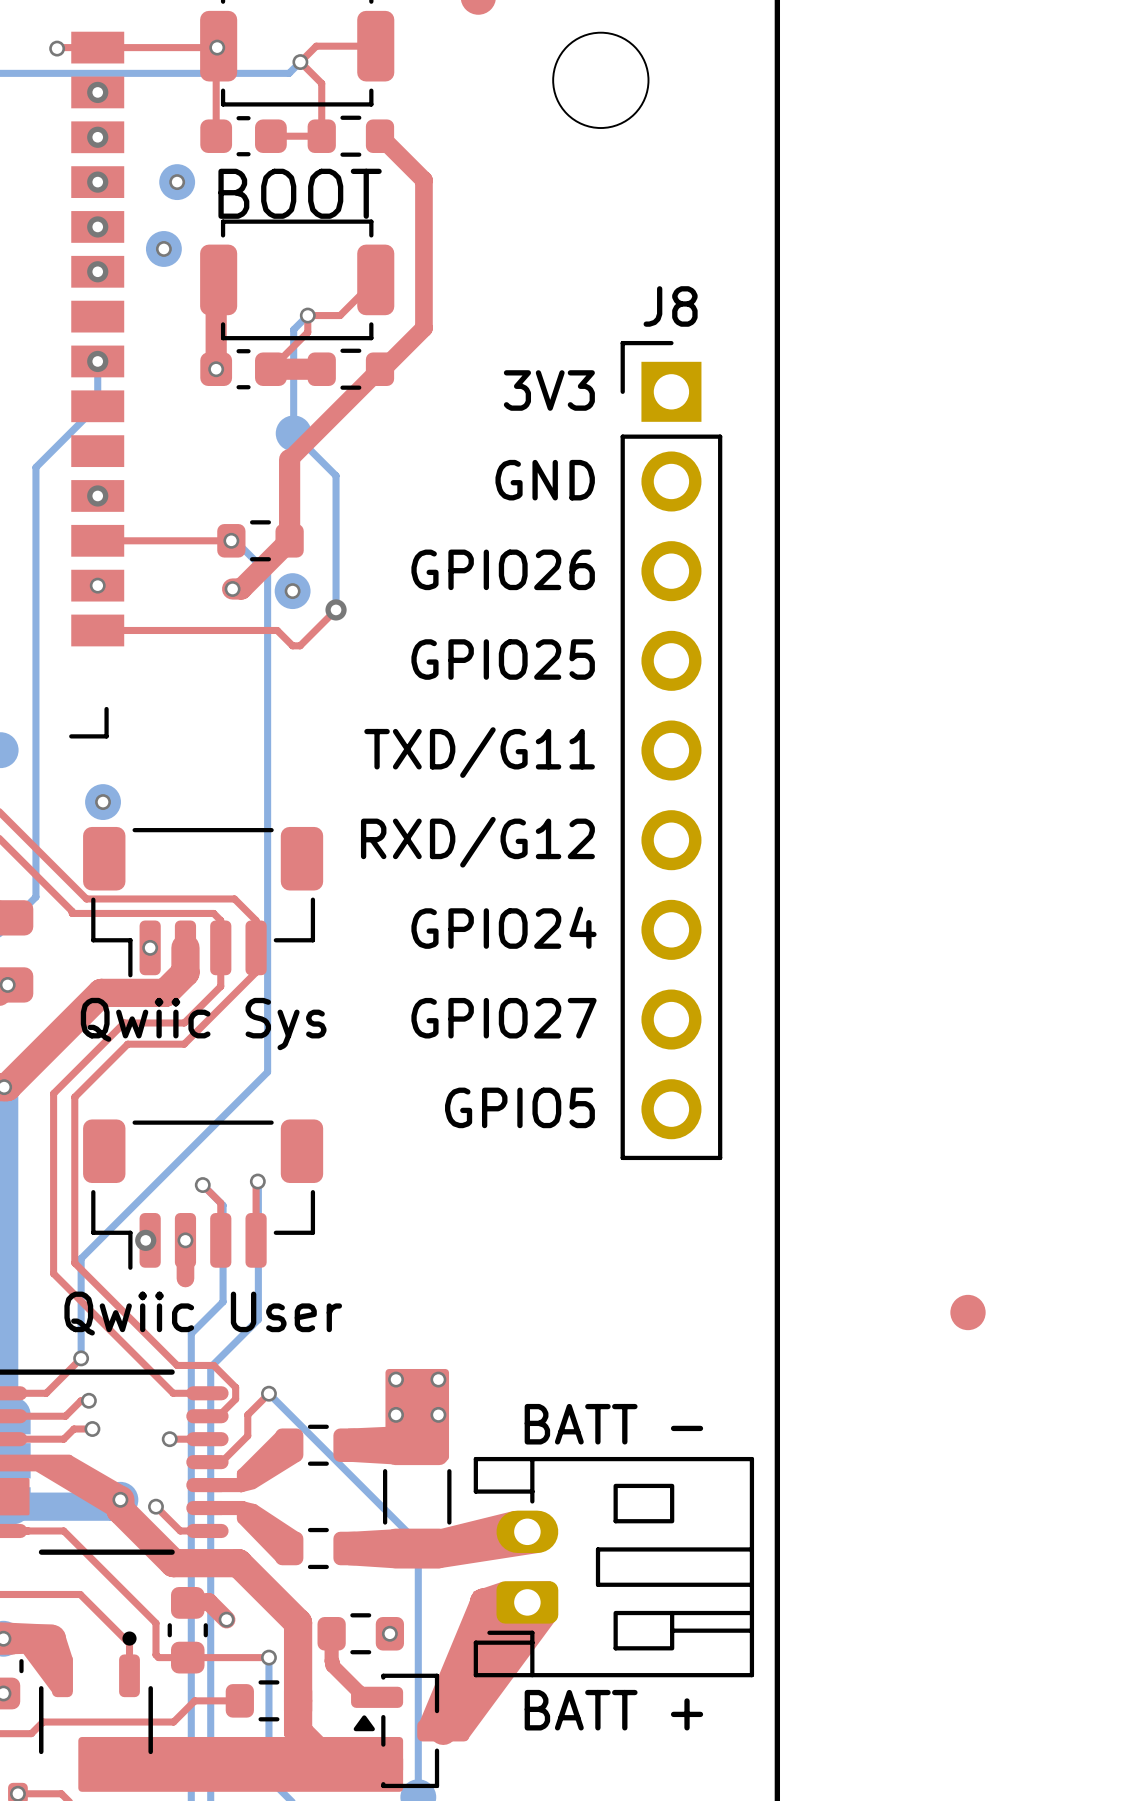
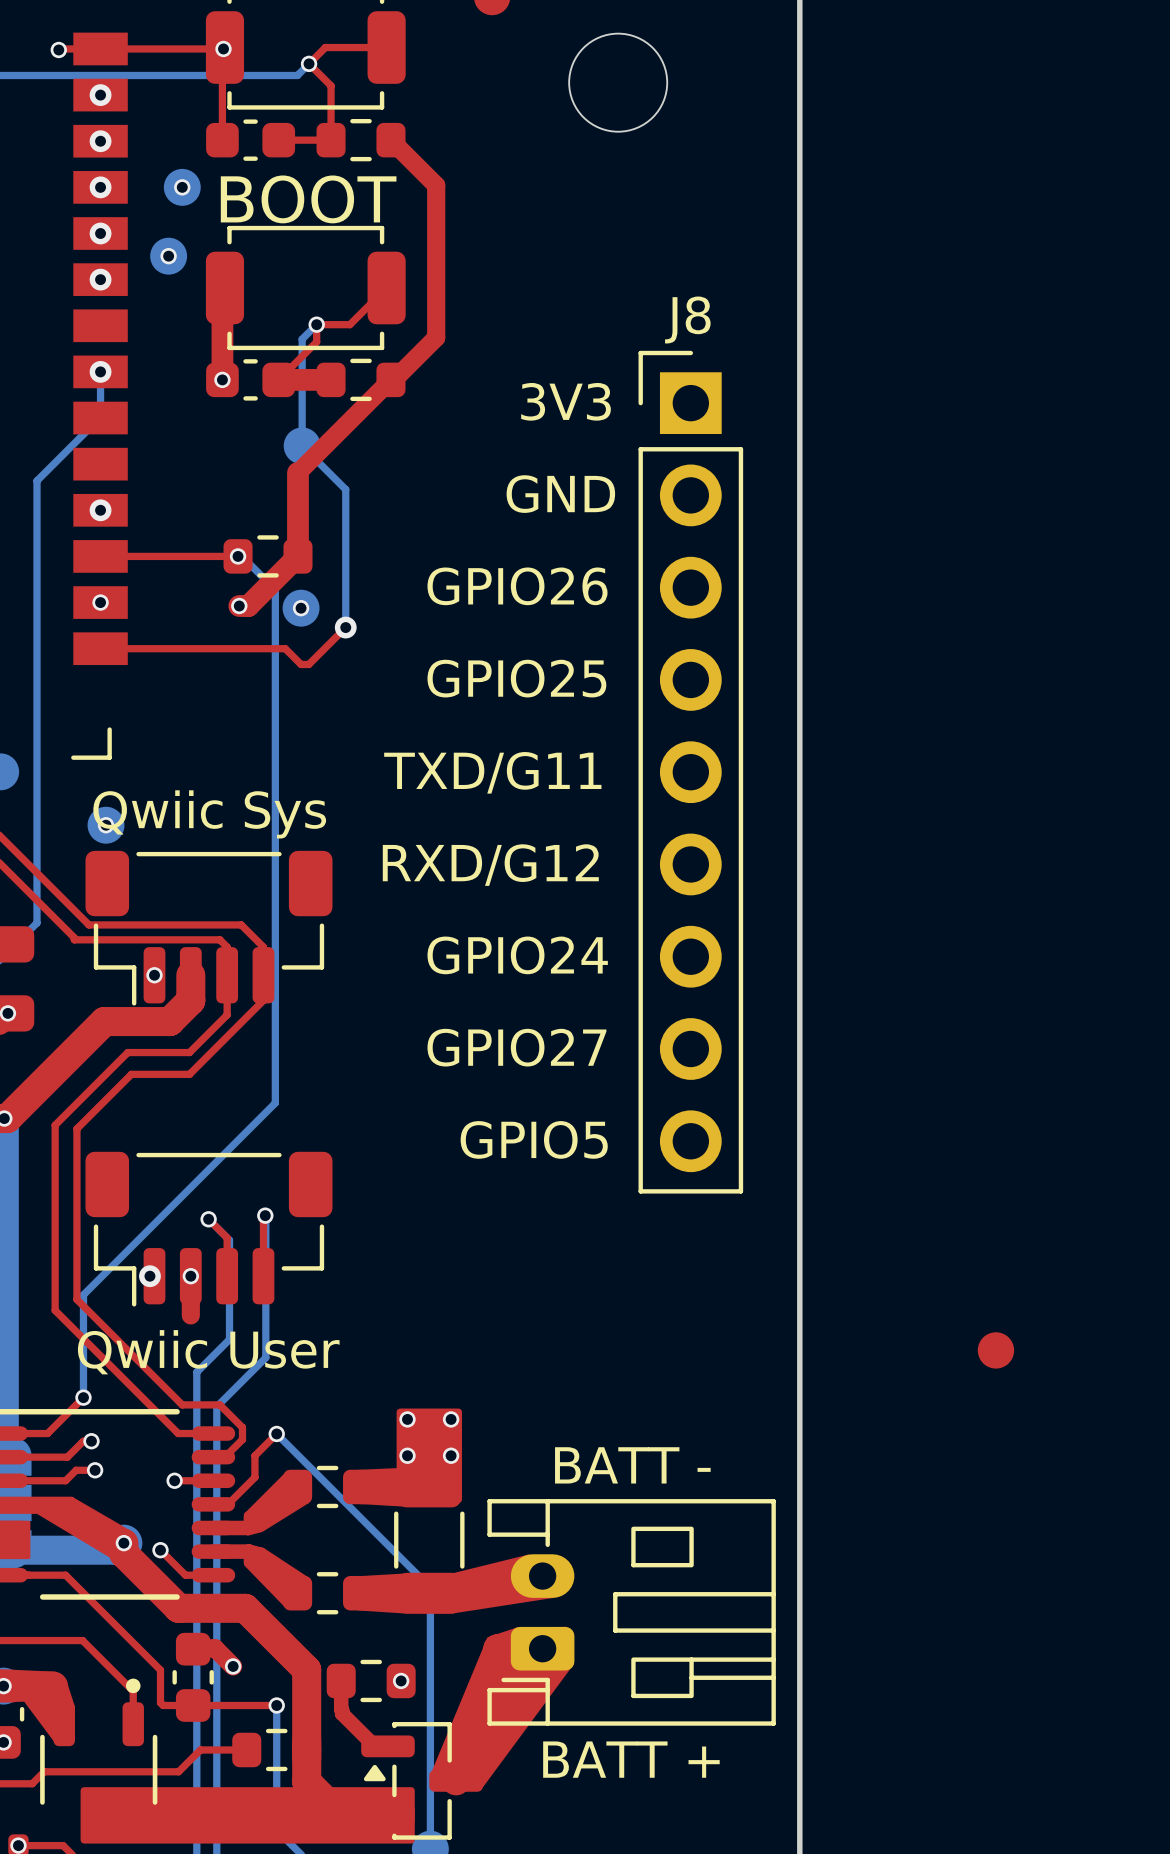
part text position: Qwiic Sys (203, 1024) -> Qwiic Sys (209, 814)

